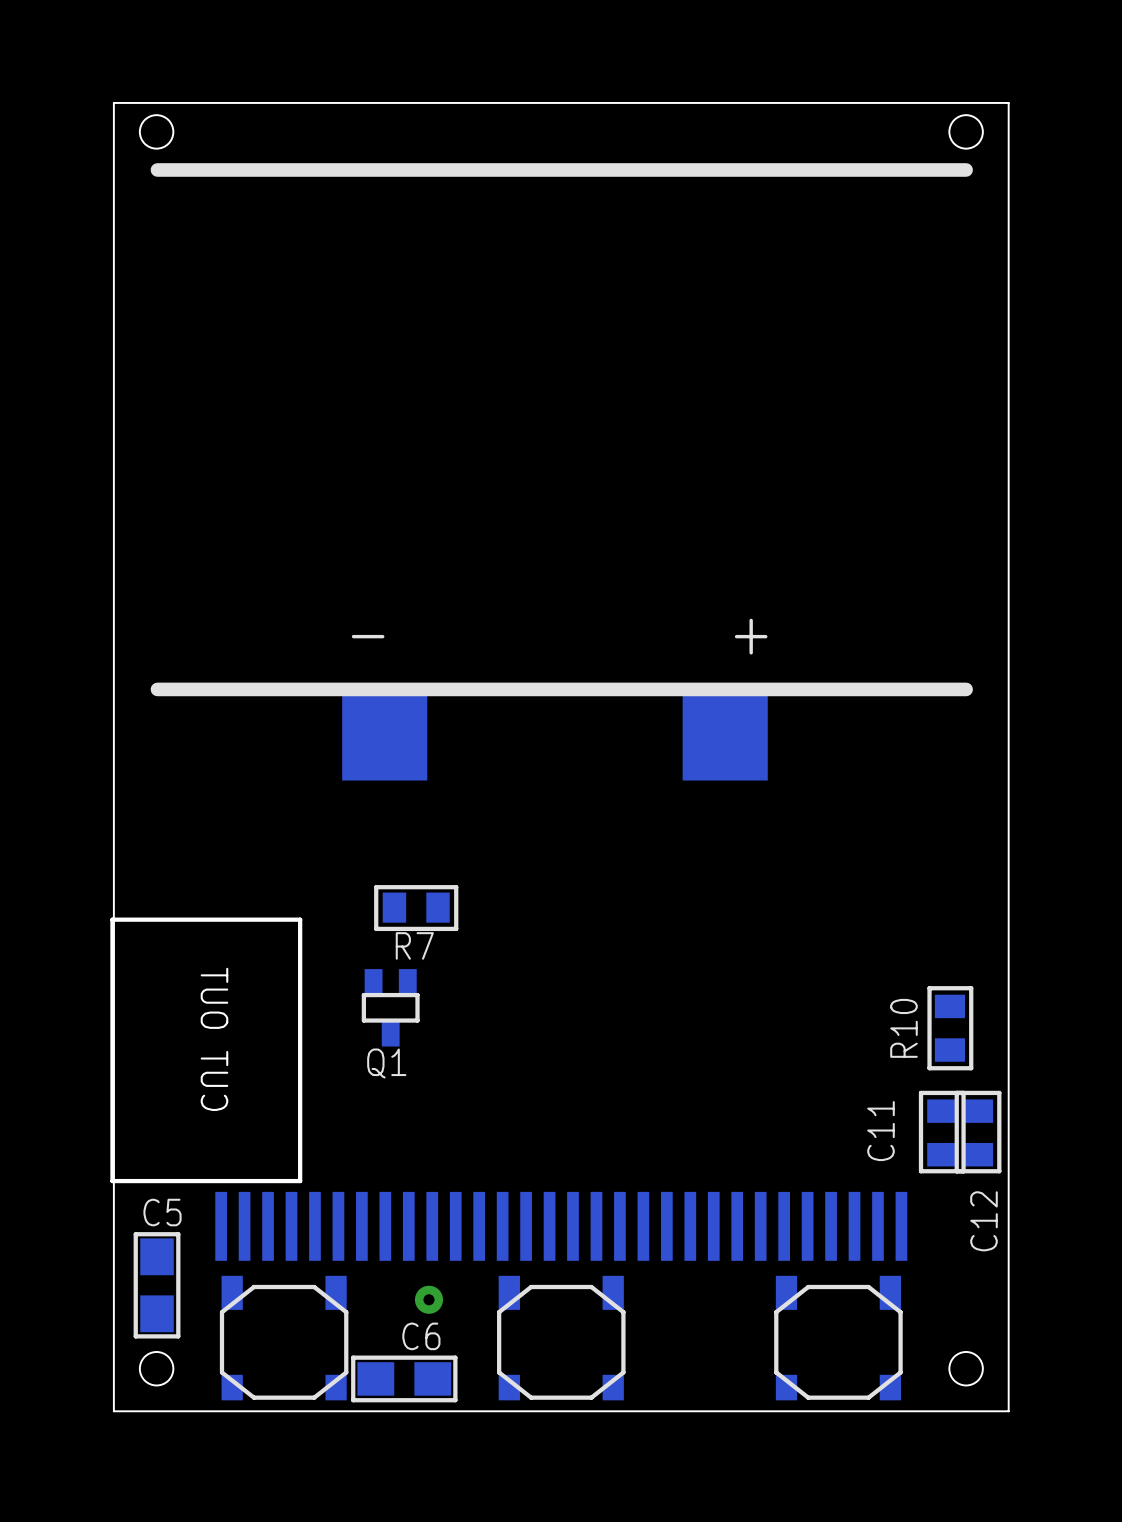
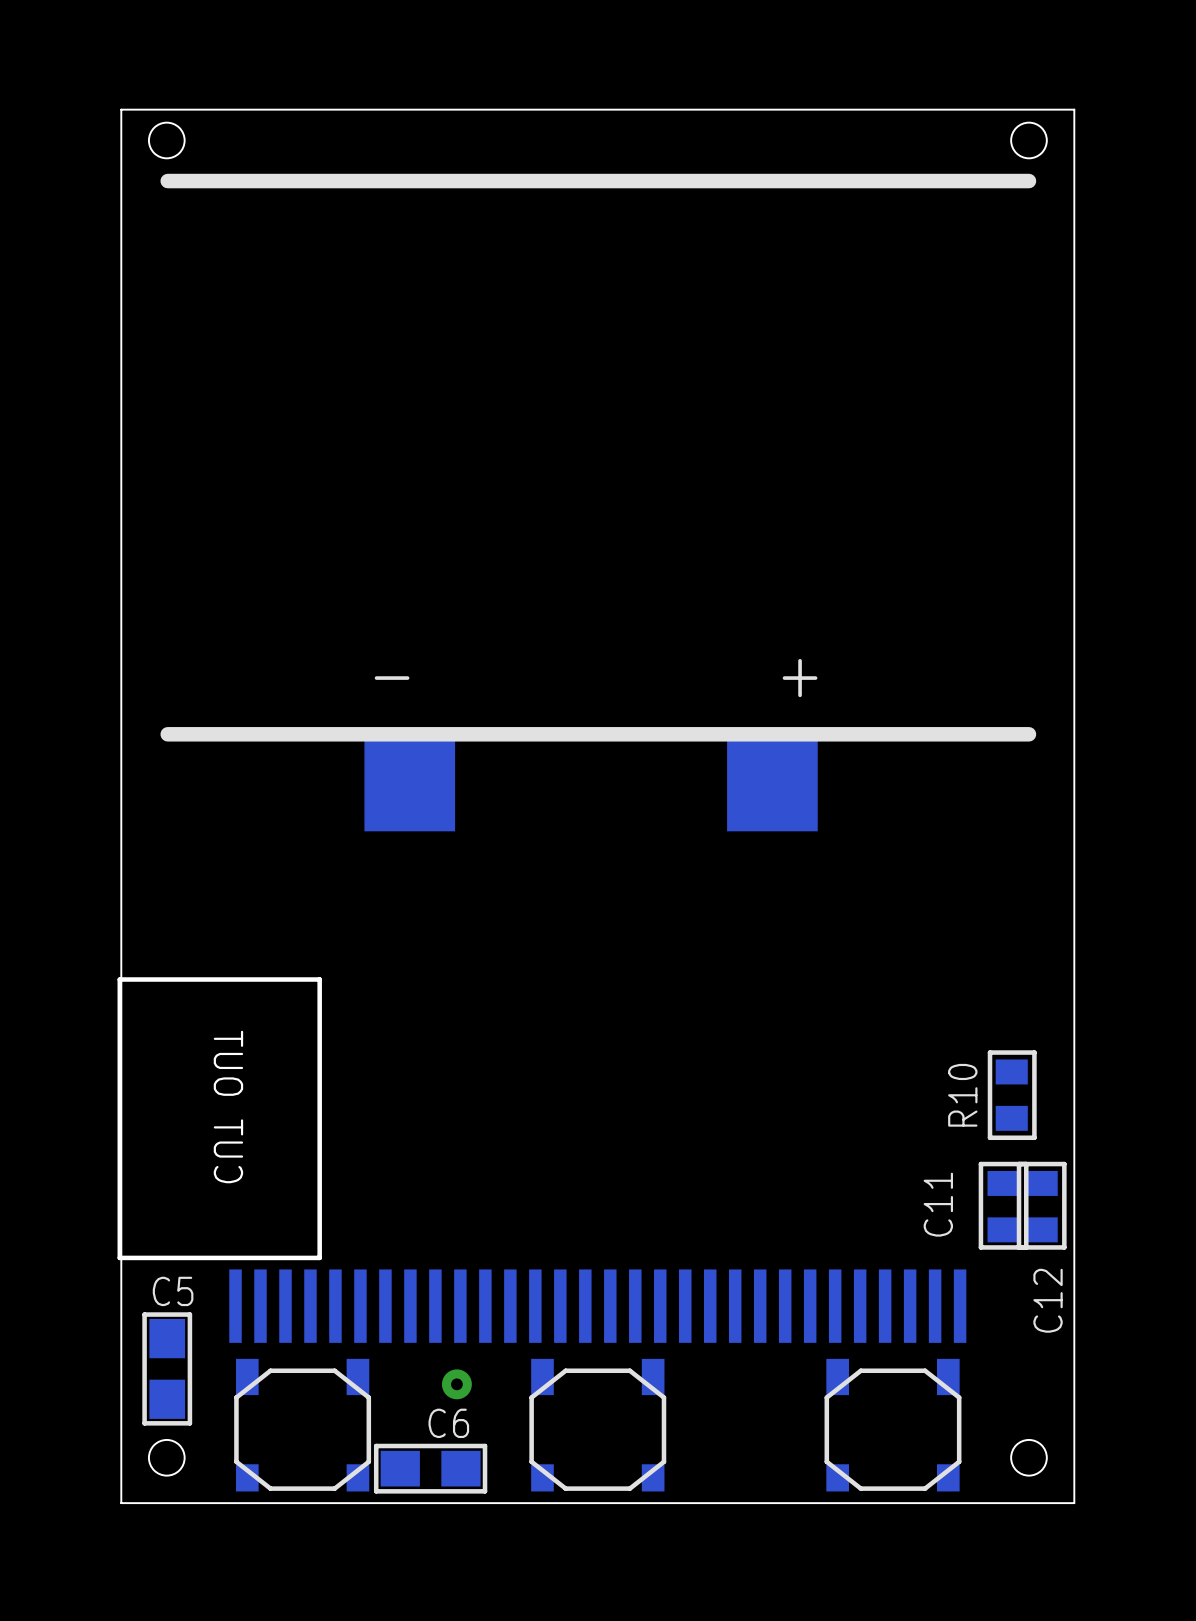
R7: (416, 908) -> none
Q1: (390, 1007) -> none

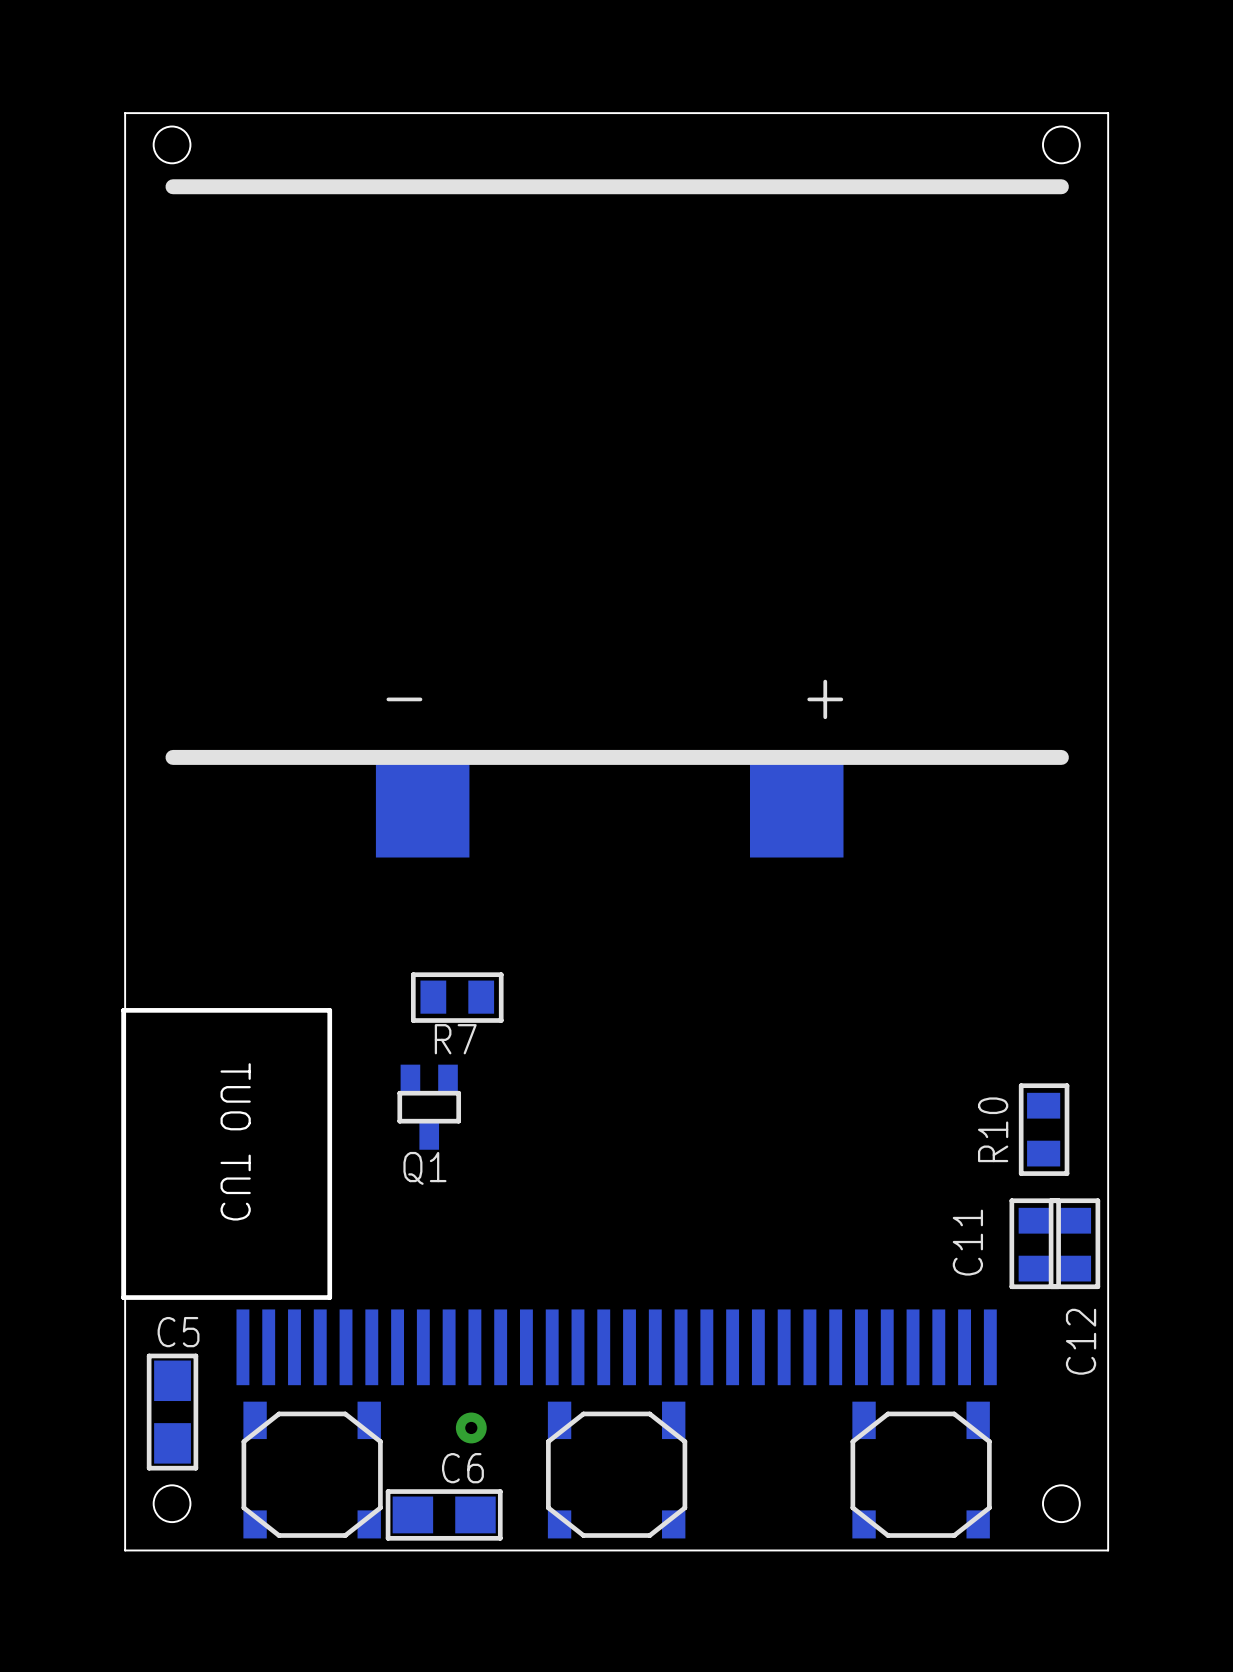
R7: none -> (457, 997)
Q1: none -> (429, 1107)

